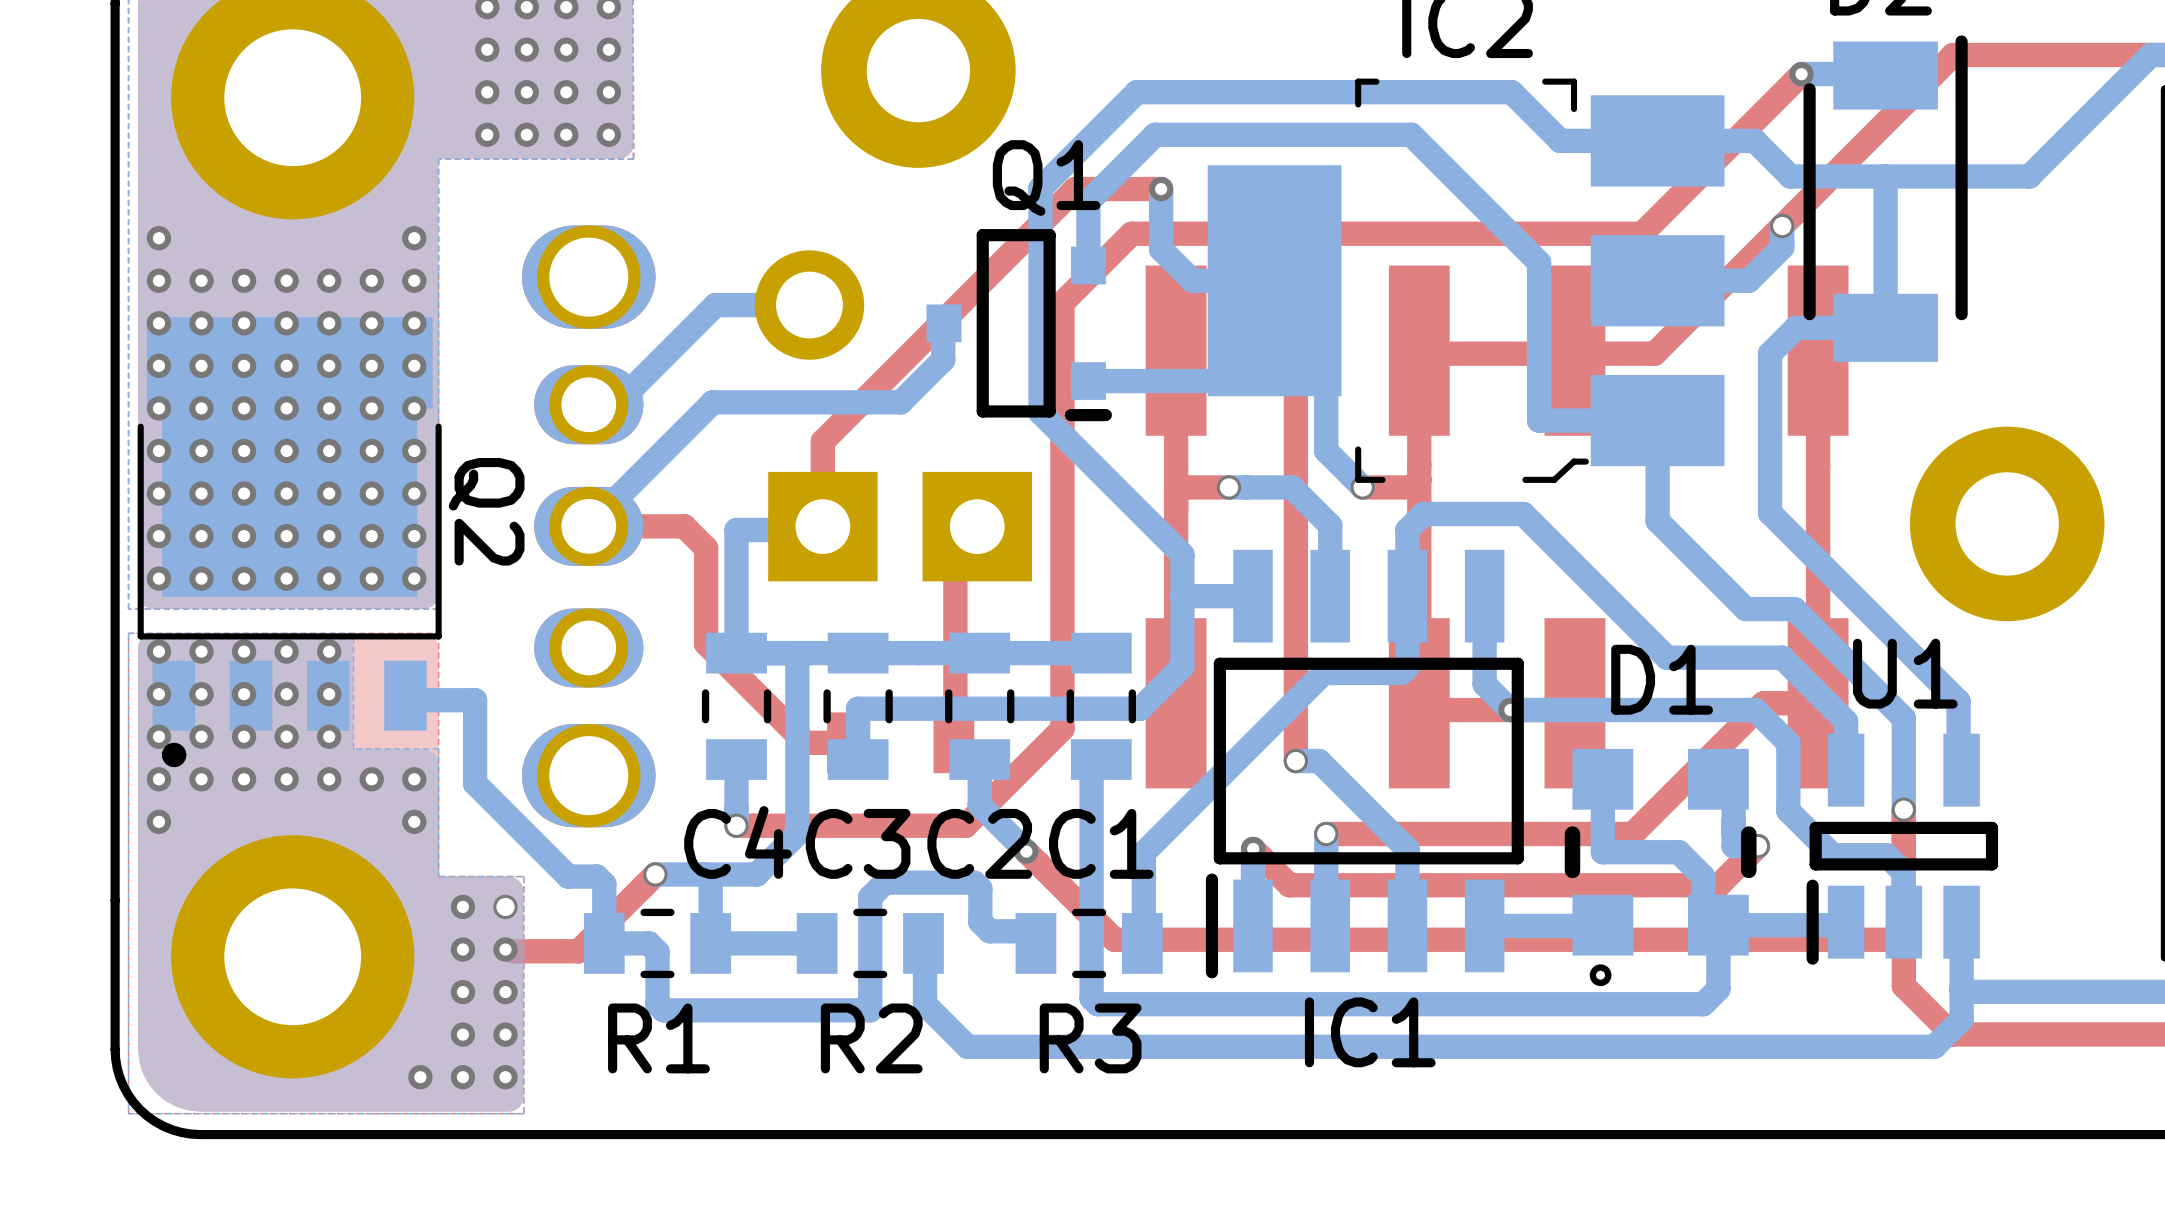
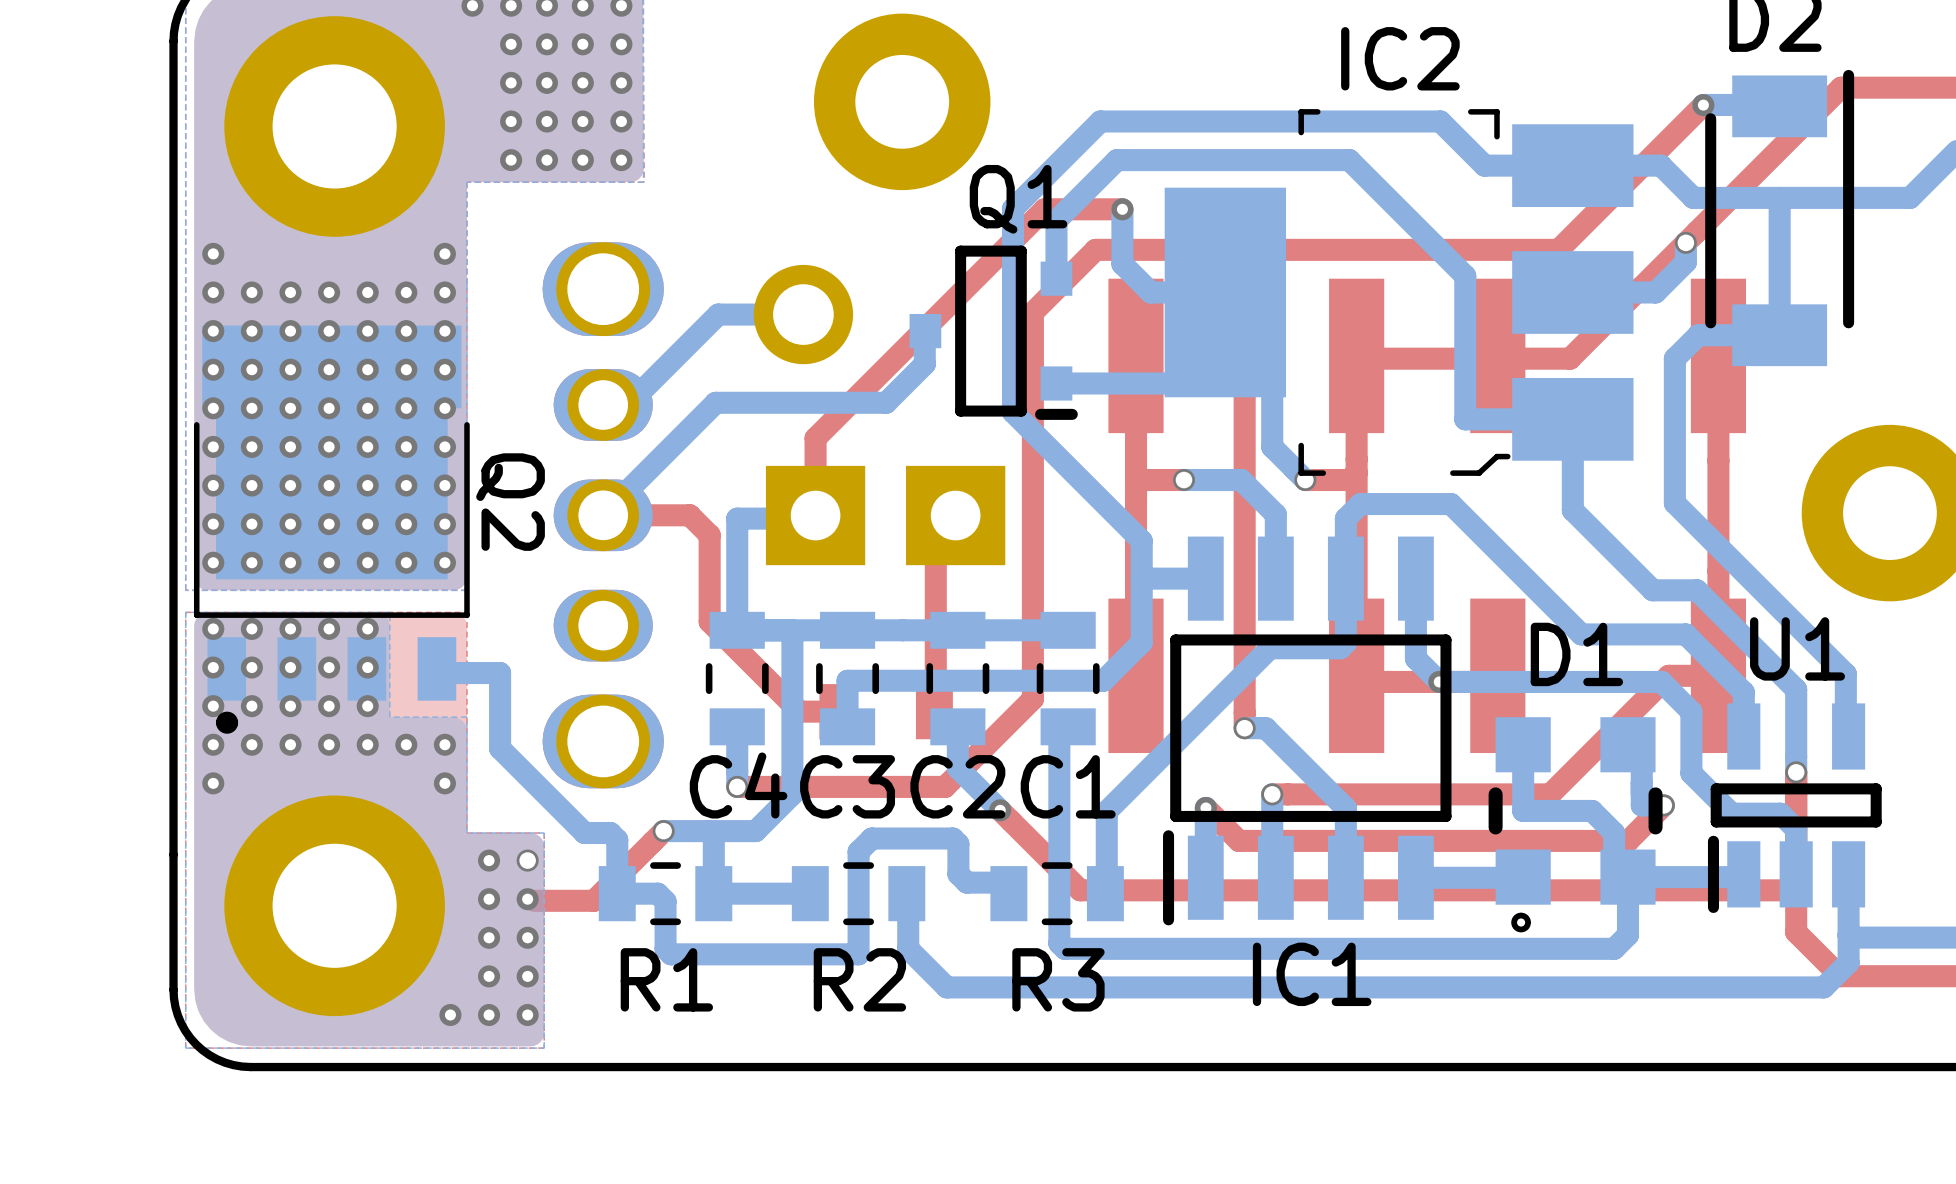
C4 name position: C4 (737, 842) -> C4 (738, 785)
C3 name position: C3 (858, 843) -> C3 (847, 786)
C2 name position: C2 (979, 843) -> C2 (957, 786)
C1 name position: C1 (1101, 843) -> C1 (1068, 786)

